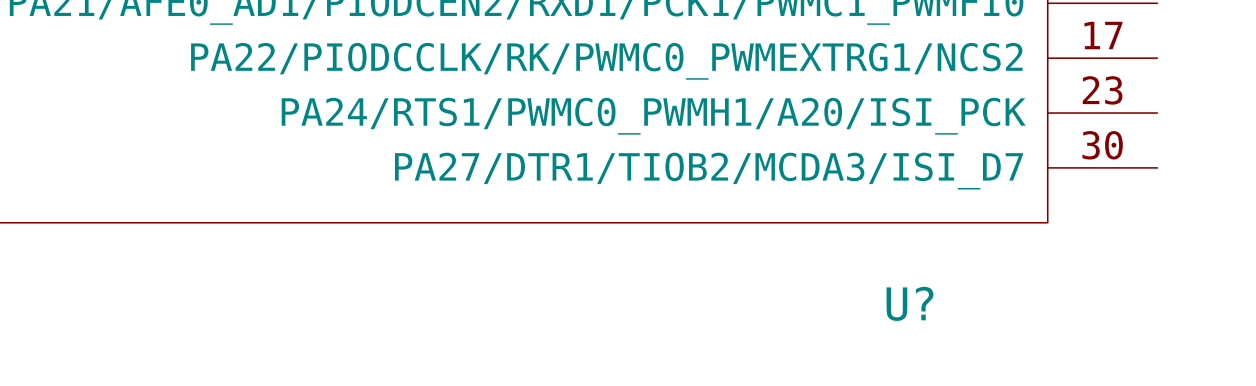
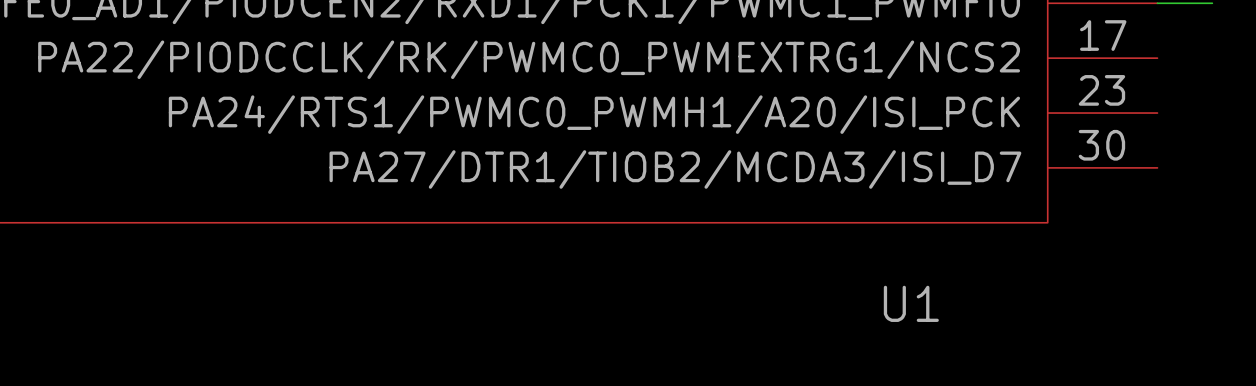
wire: none -> (1157, 3) (1212, 3)
U? name: U? (910, 303) -> U1 (911, 303)

